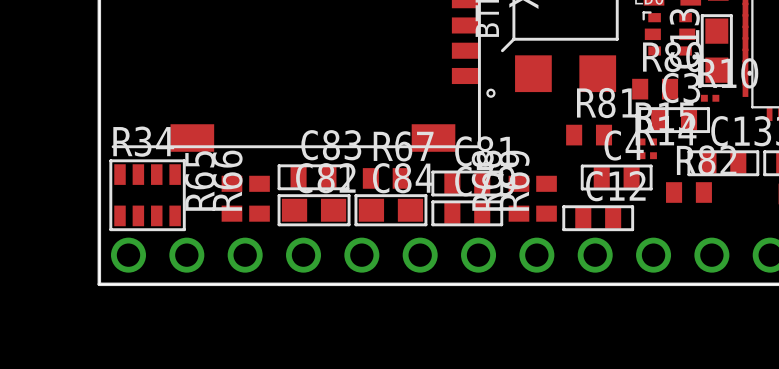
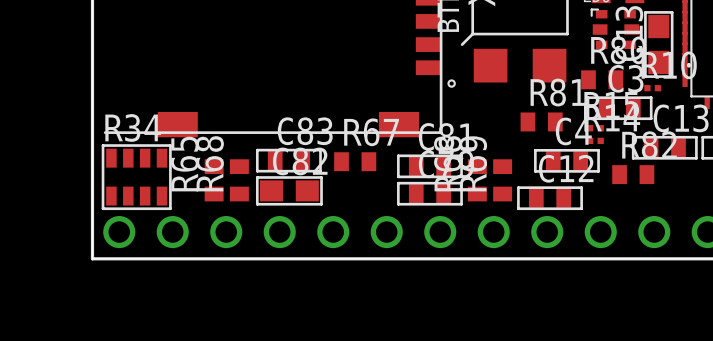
R66 name: R66 (227, 180) -> R68 (210, 163)
C84: (390, 210) -> none

